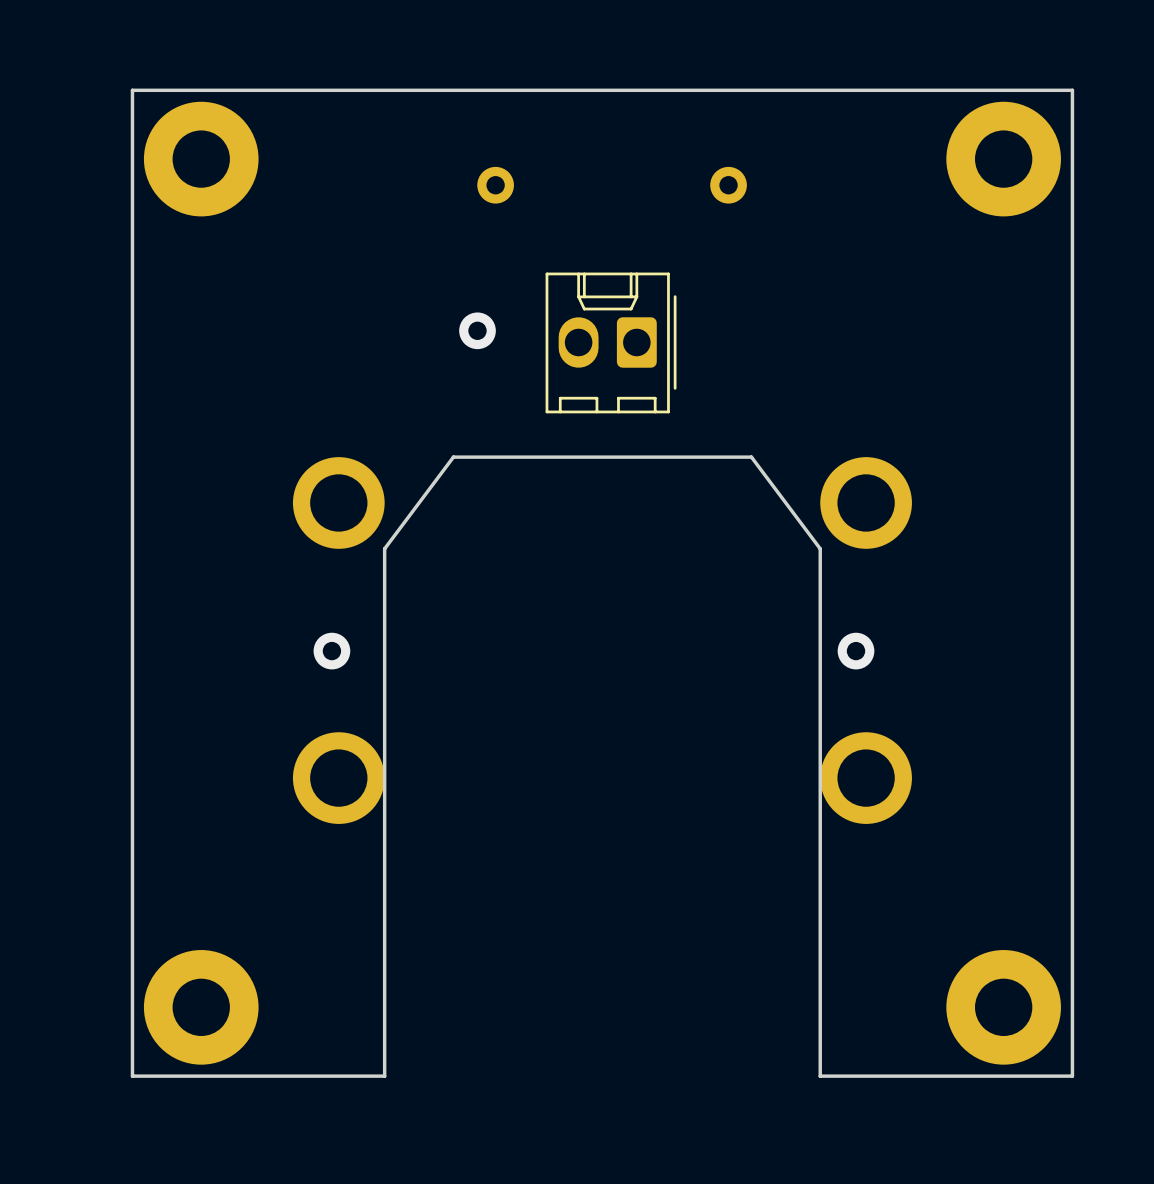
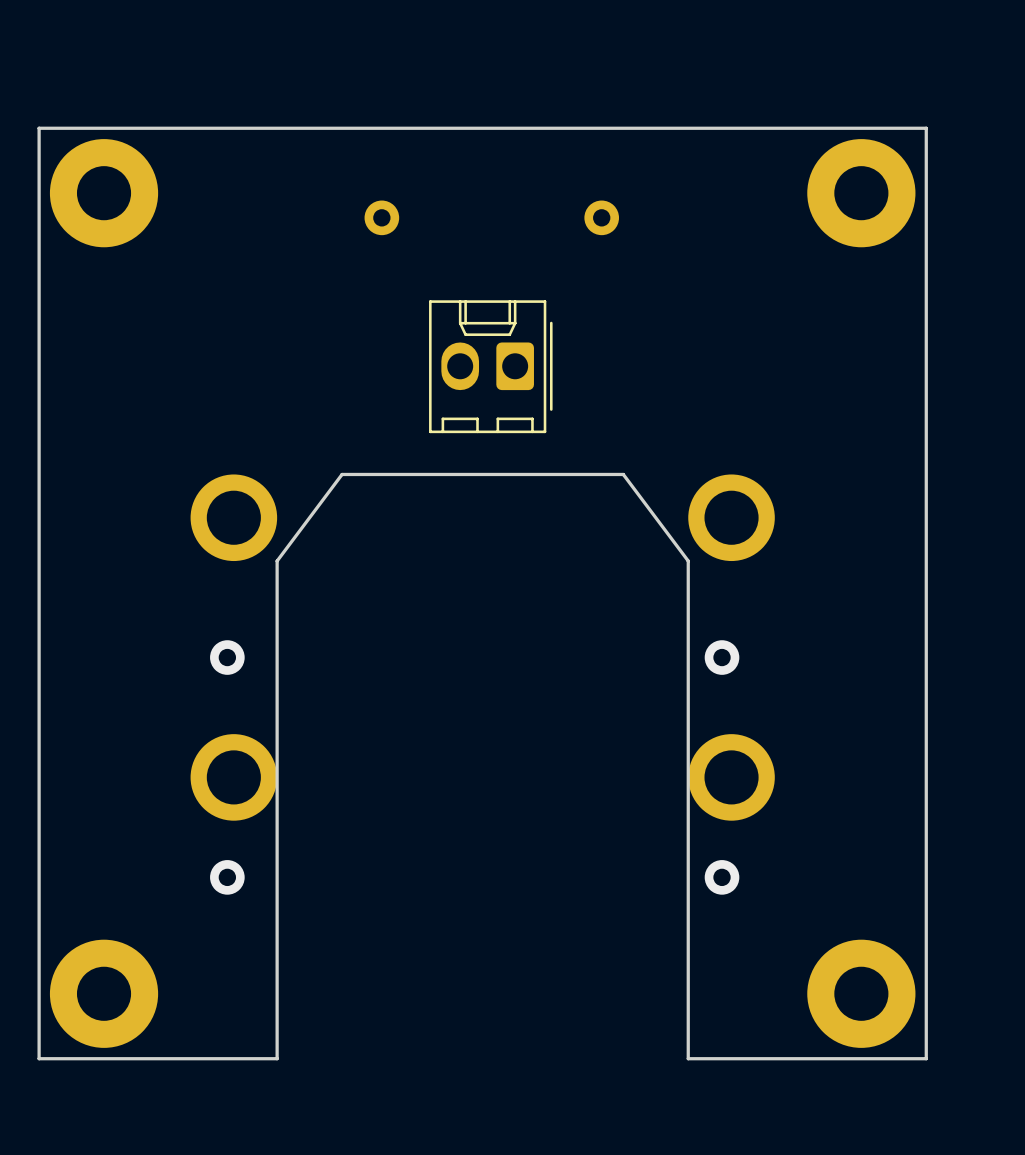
via: (477, 330) -> none
via: none -> (227, 877)
via: none -> (722, 877)

